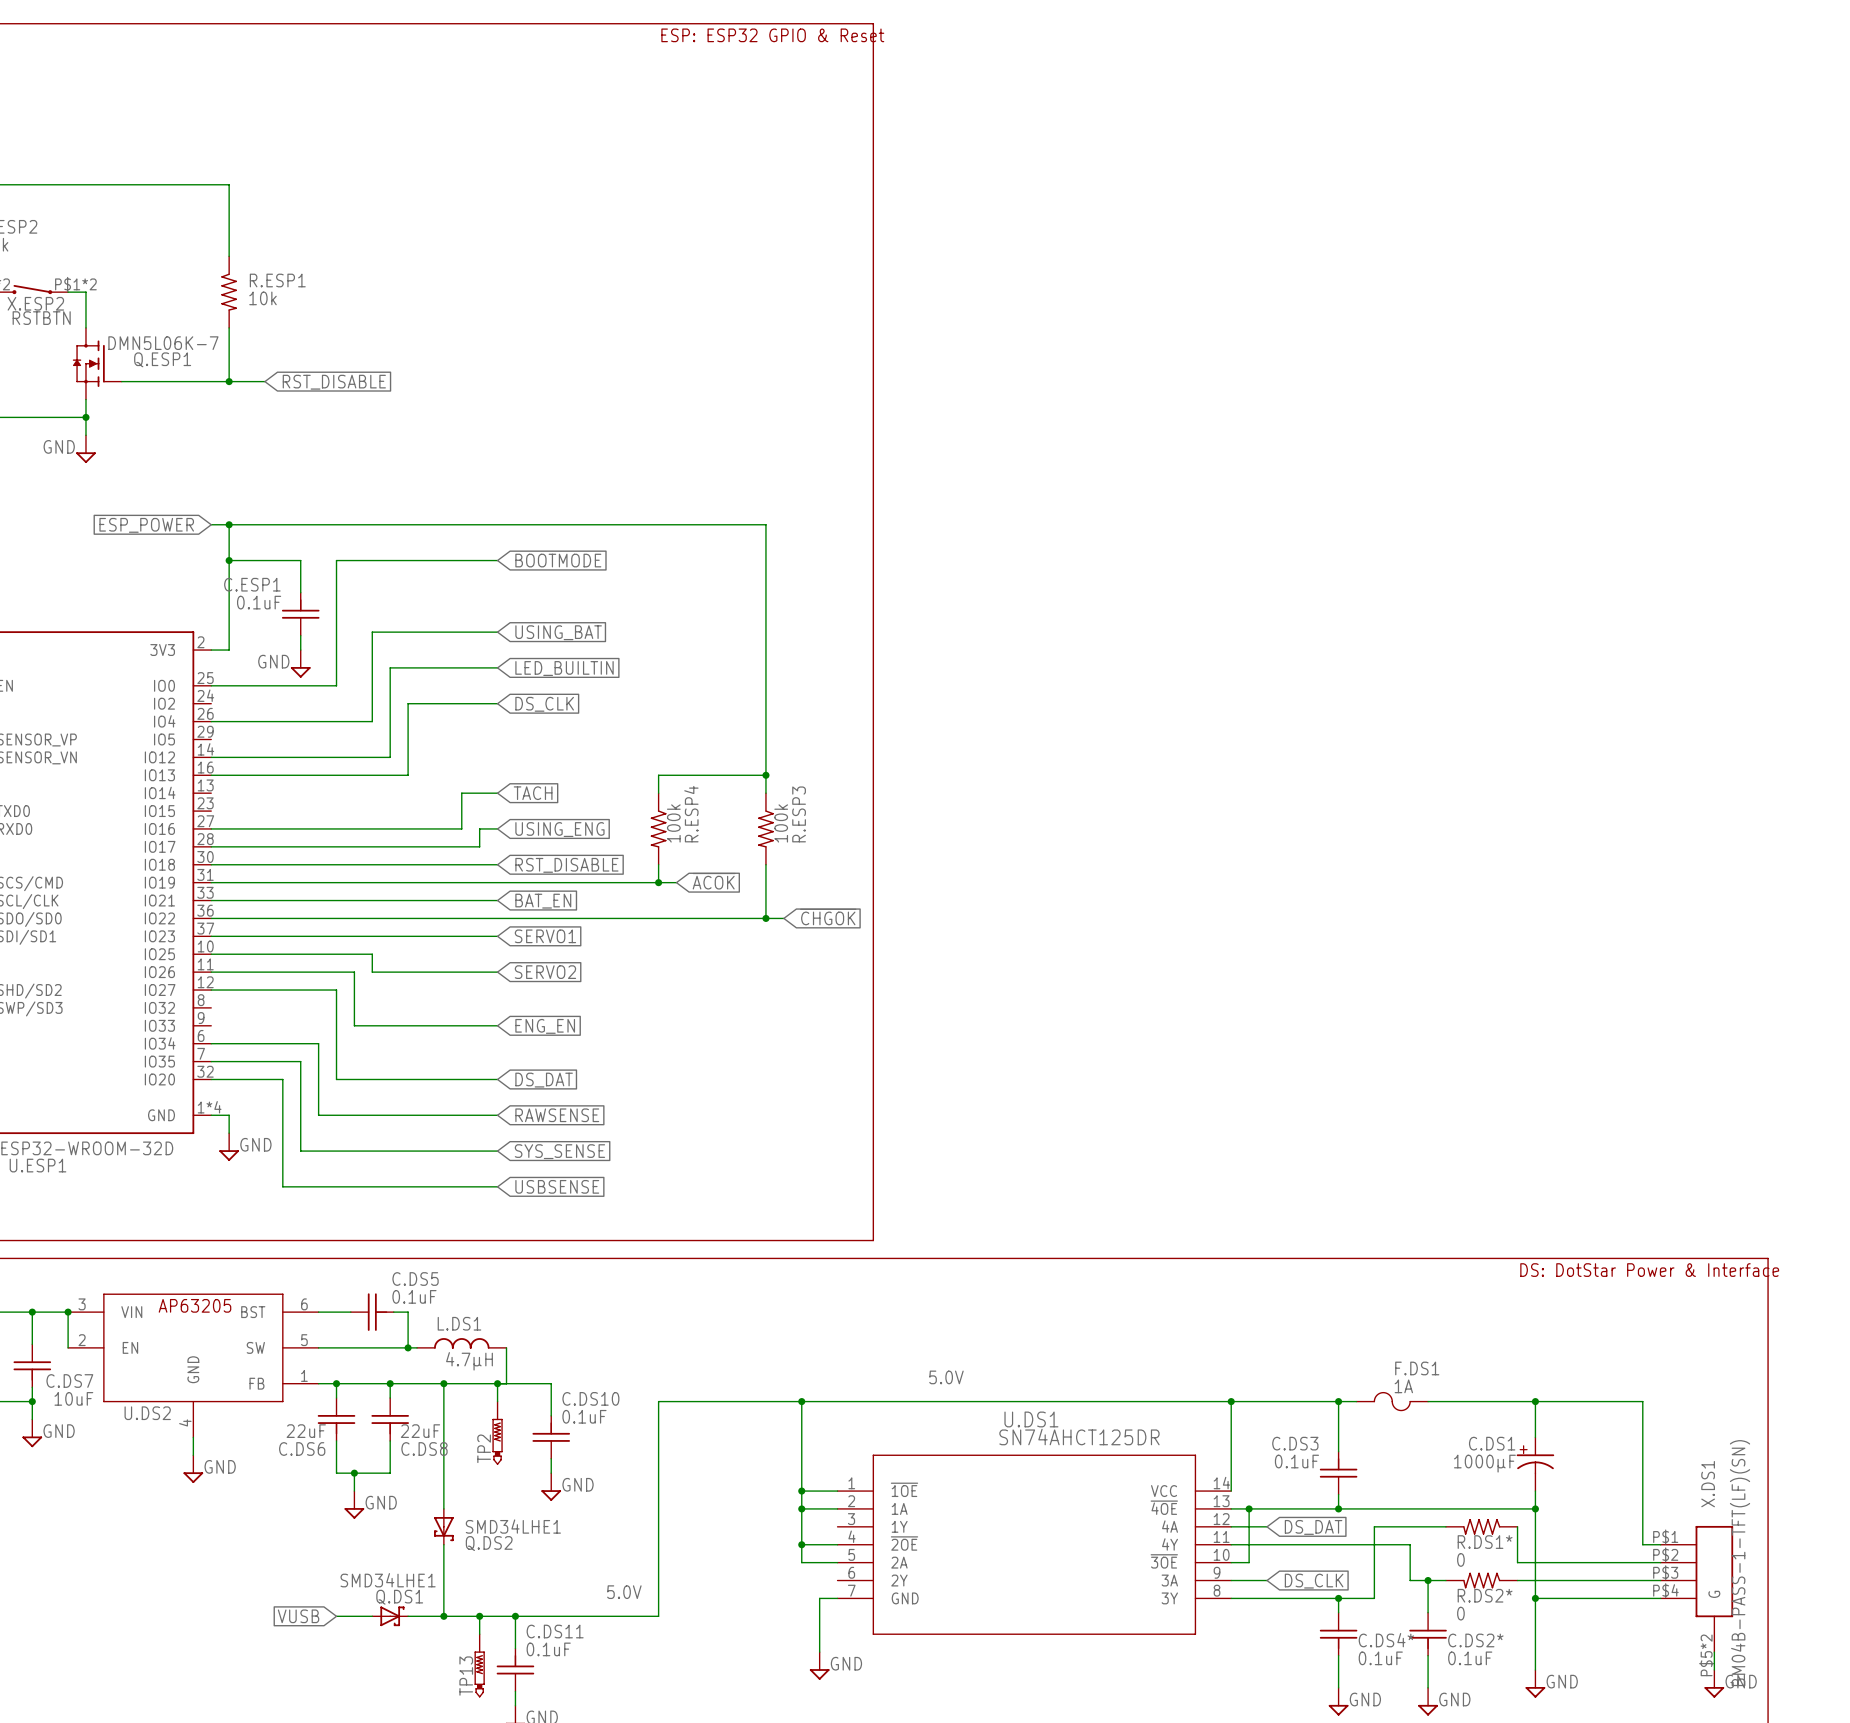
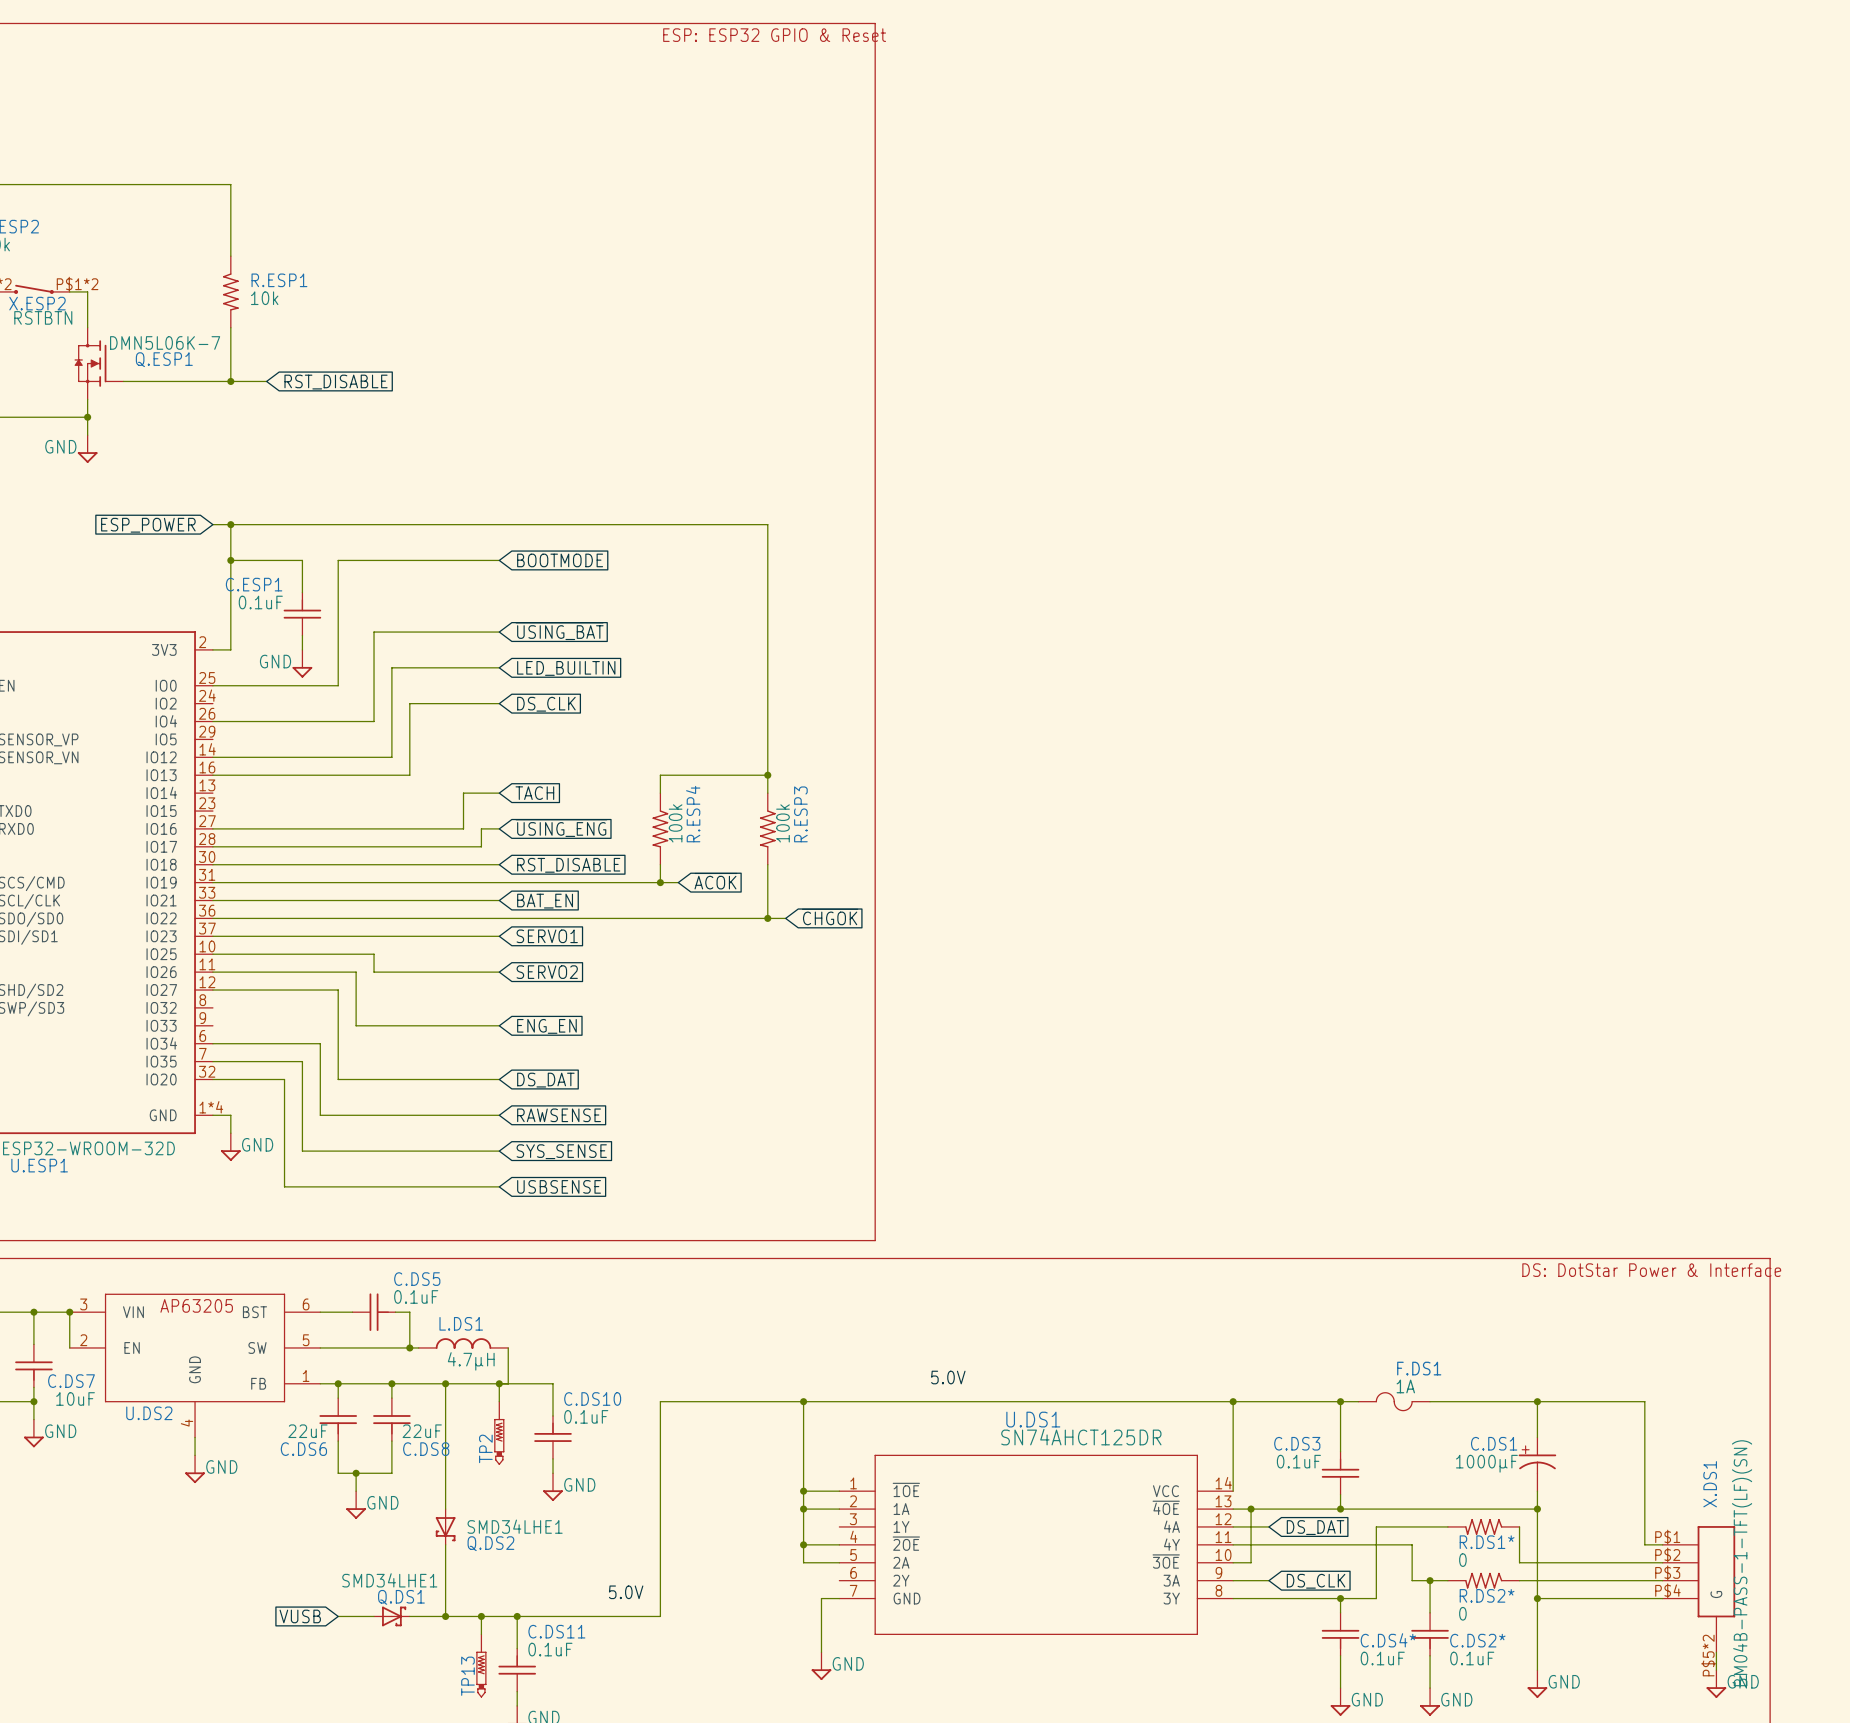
global label: USING_BAT (558, 632) -> ~{USING_BAT} (559, 631)
global label: USING_ENG (559, 829) -> ~{USING_ENG} (561, 828)

